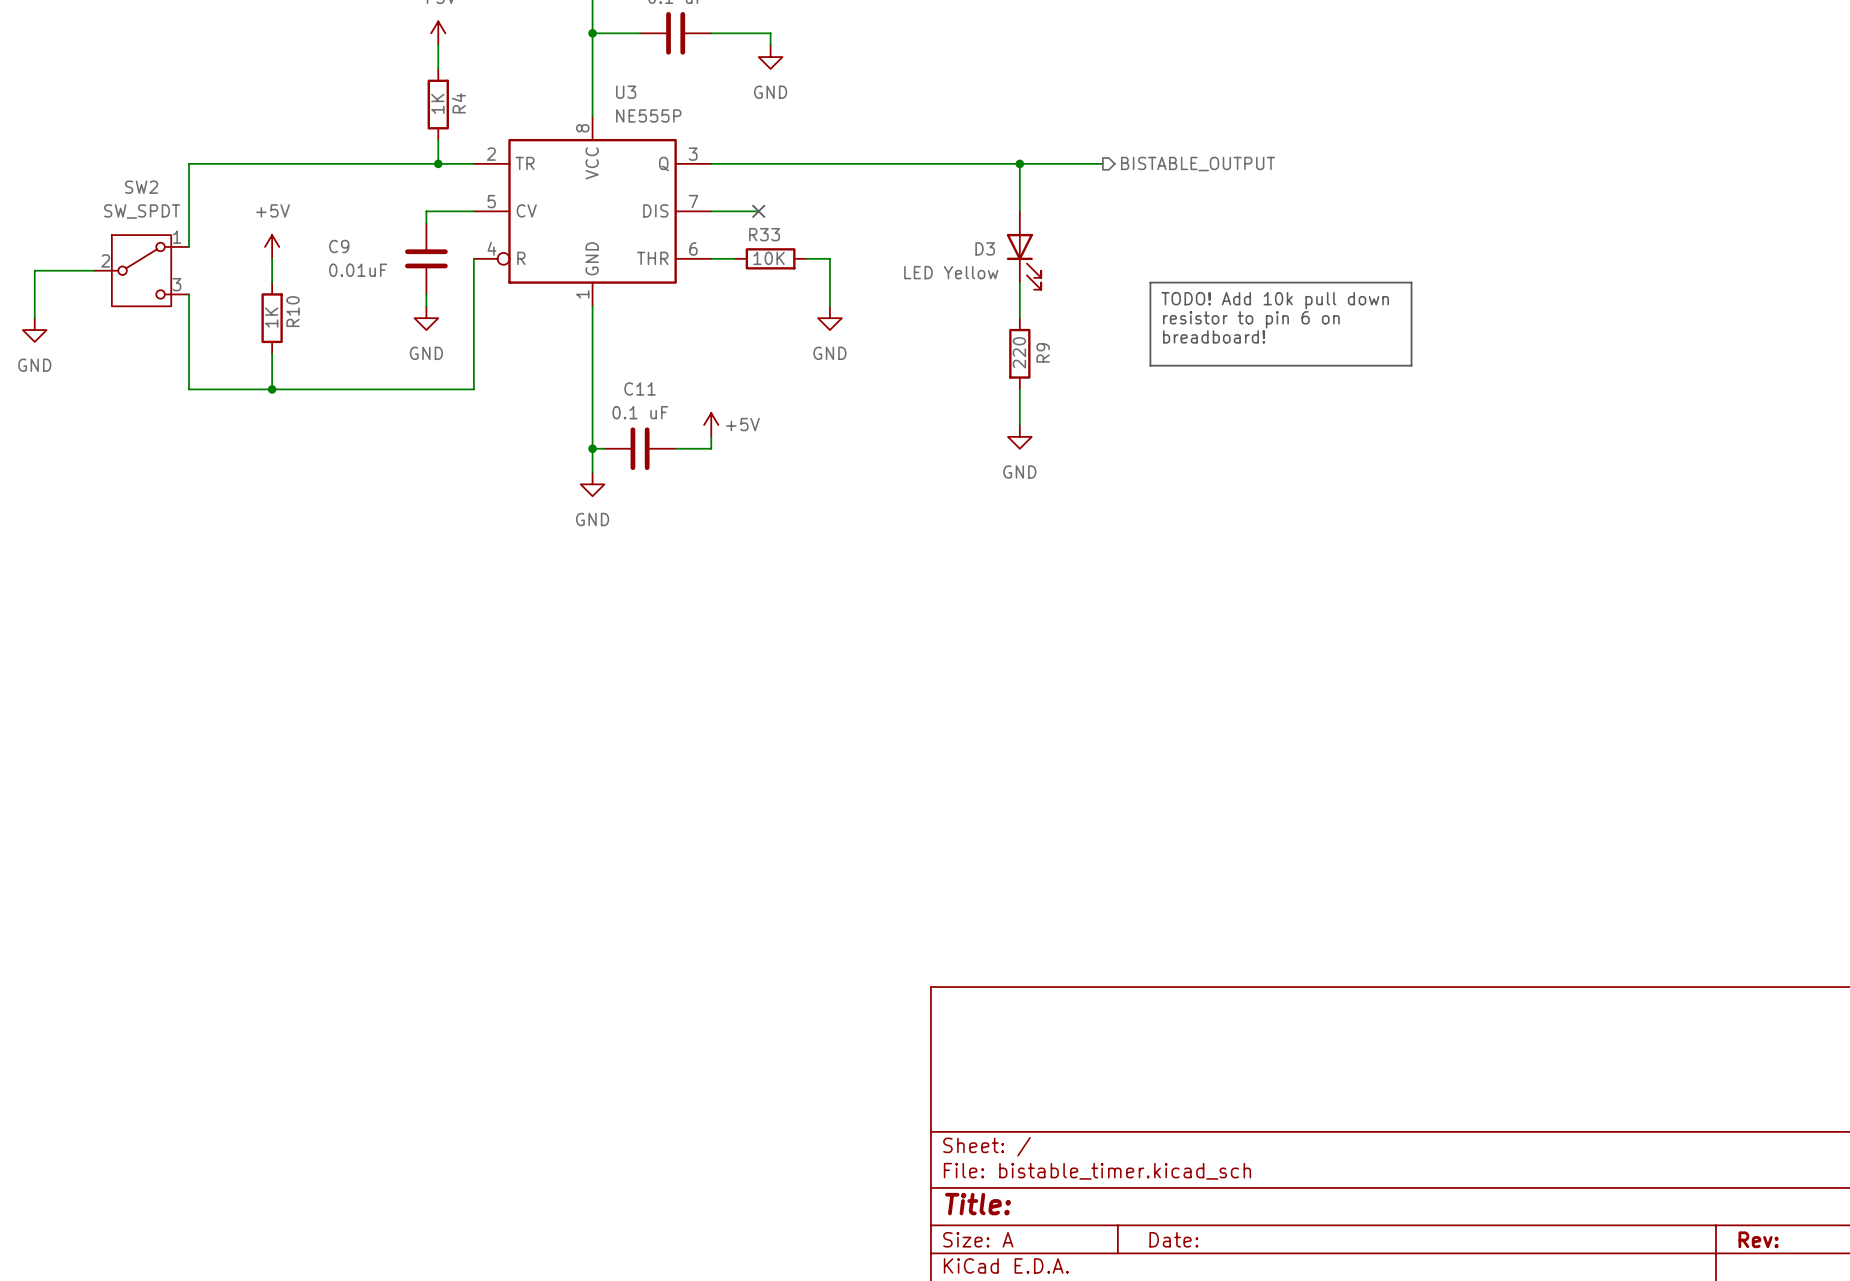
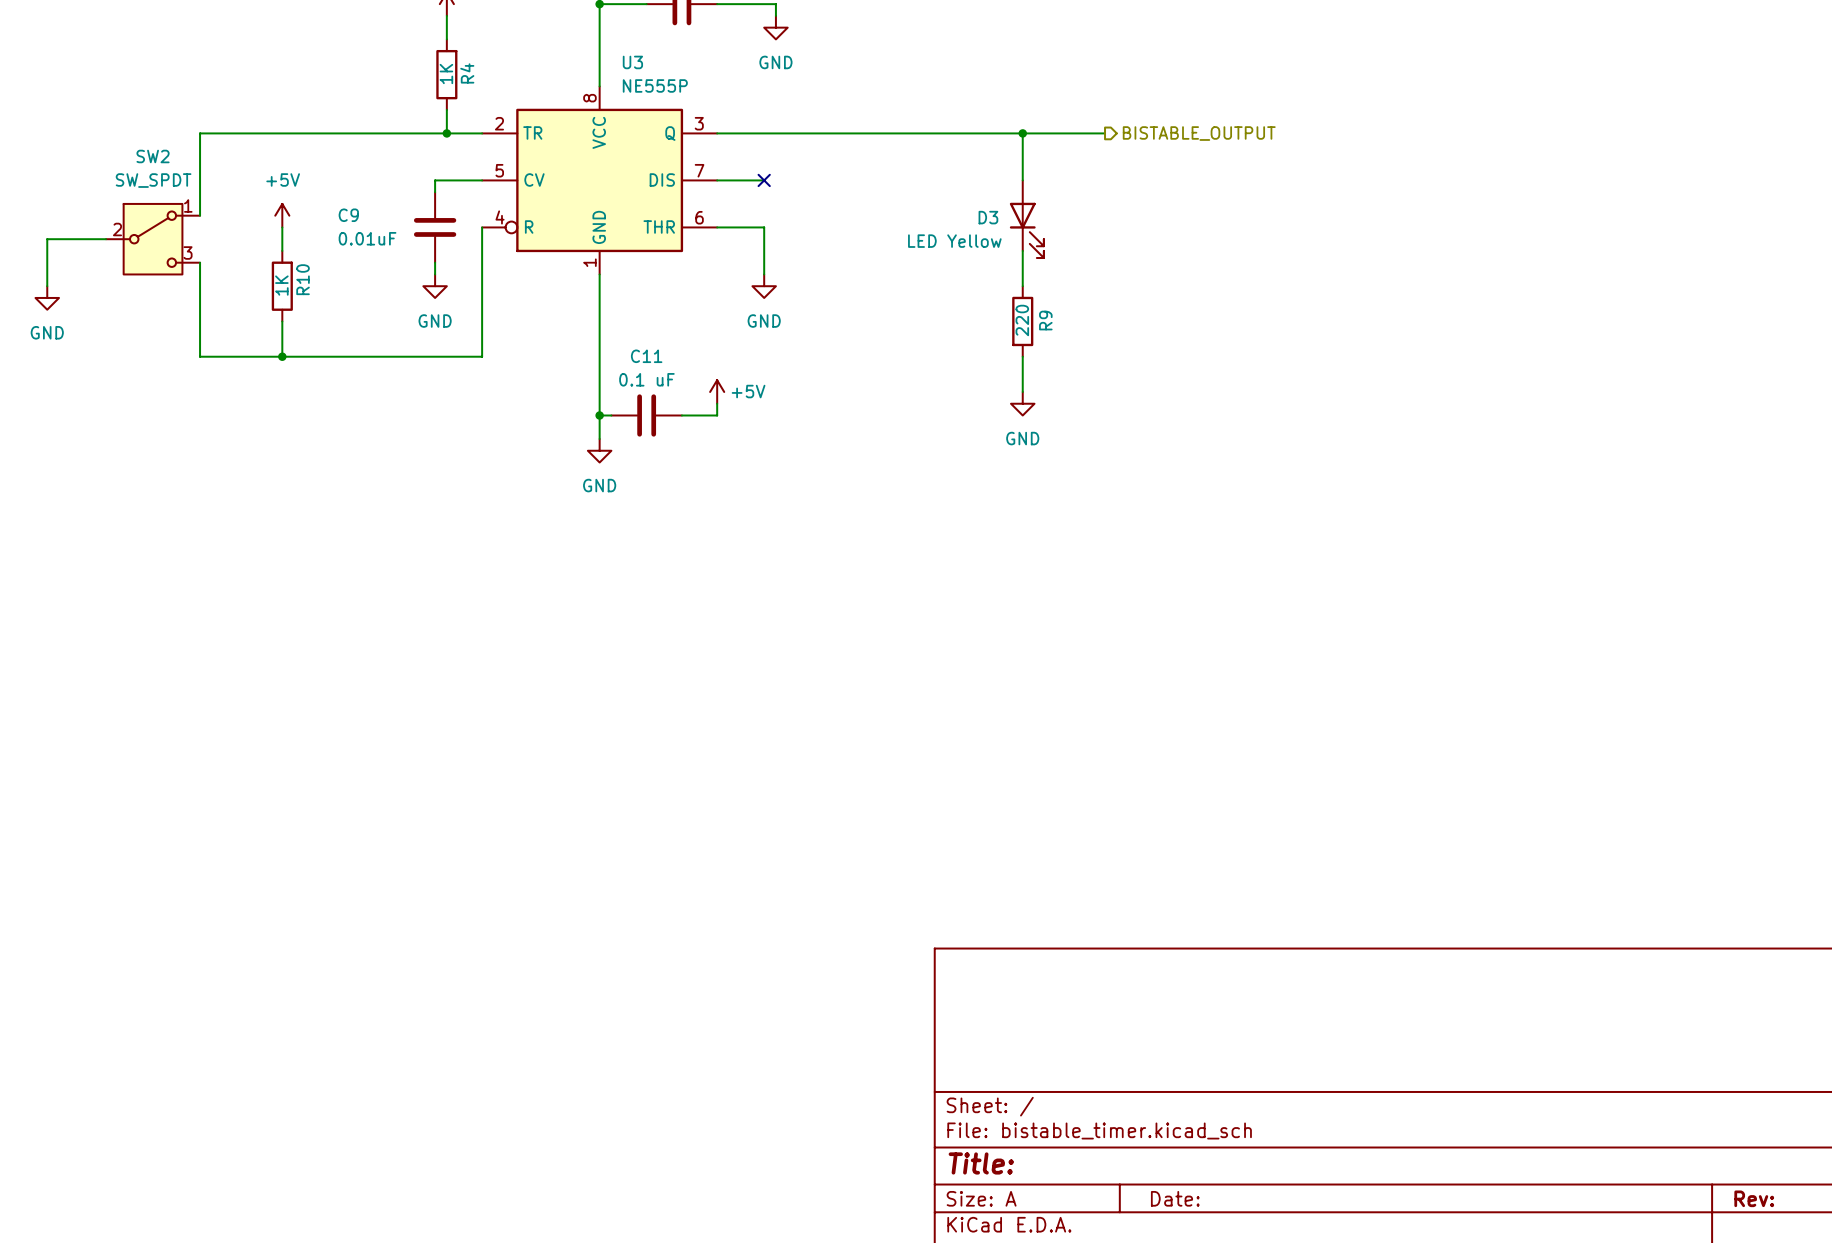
R33: 10K (770, 258) -> none
wire: (806, 258) (829, 258) (829, 306) -> (740, 227) (764, 227) (764, 274)
line: (1150, 282) (1411, 282) (1411, 365) (1150, 365) (1150, 282) -> none
text: TODO! Add 10k pull down (1275, 300) -> none
power symbol position: GND (829, 318) -> GND (764, 286)
text: resistor to pin 6 on (1251, 319) -> none
text: breadboard! (1214, 336) -> none

